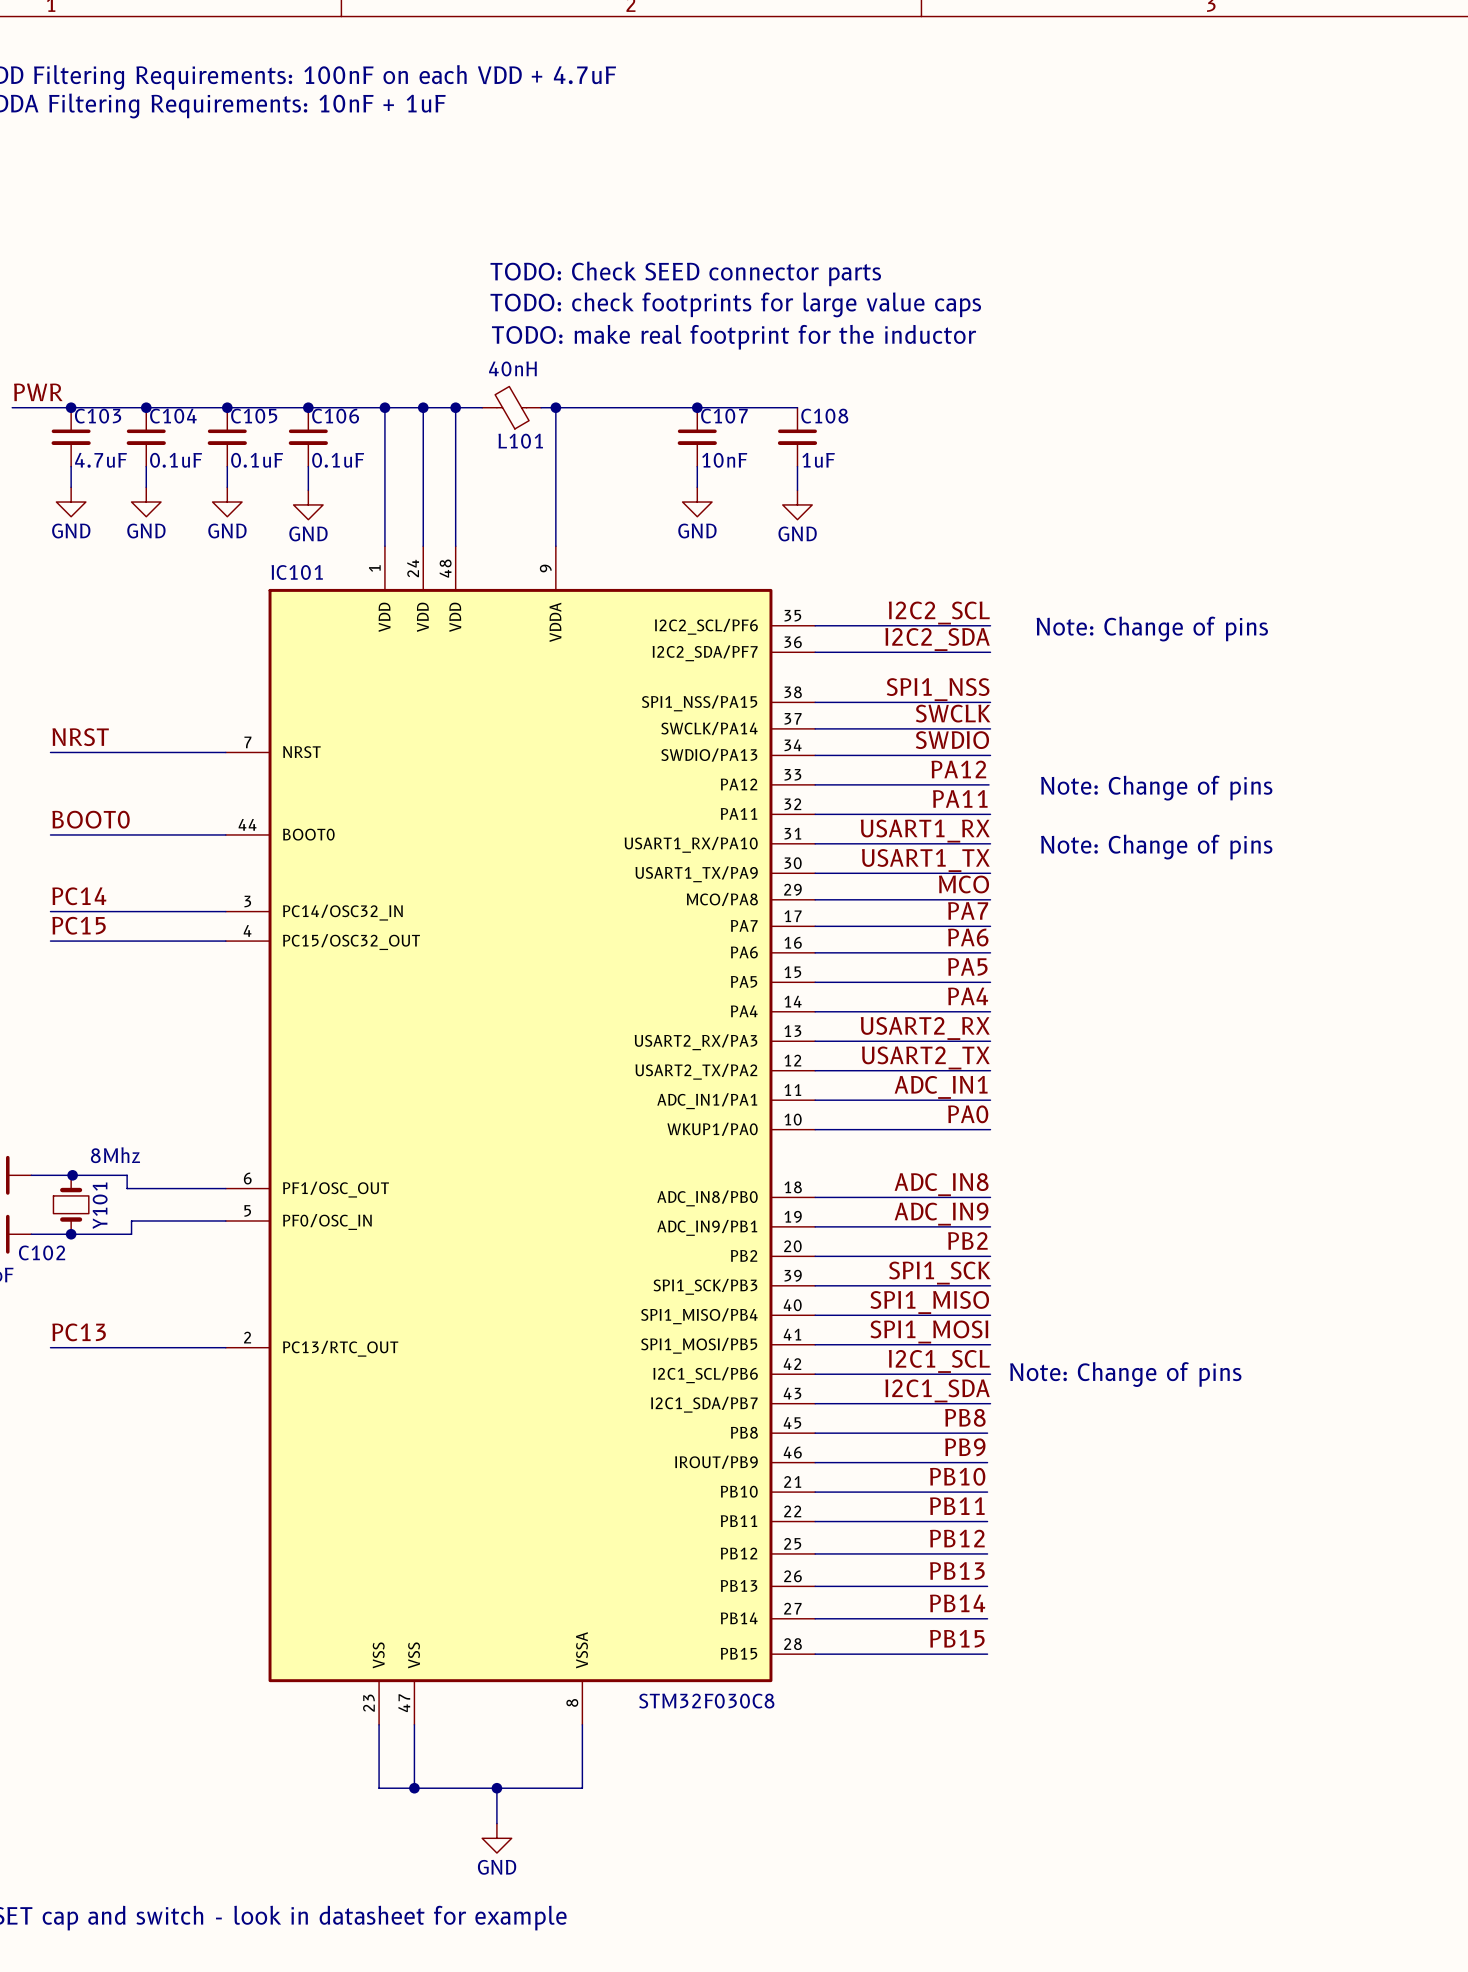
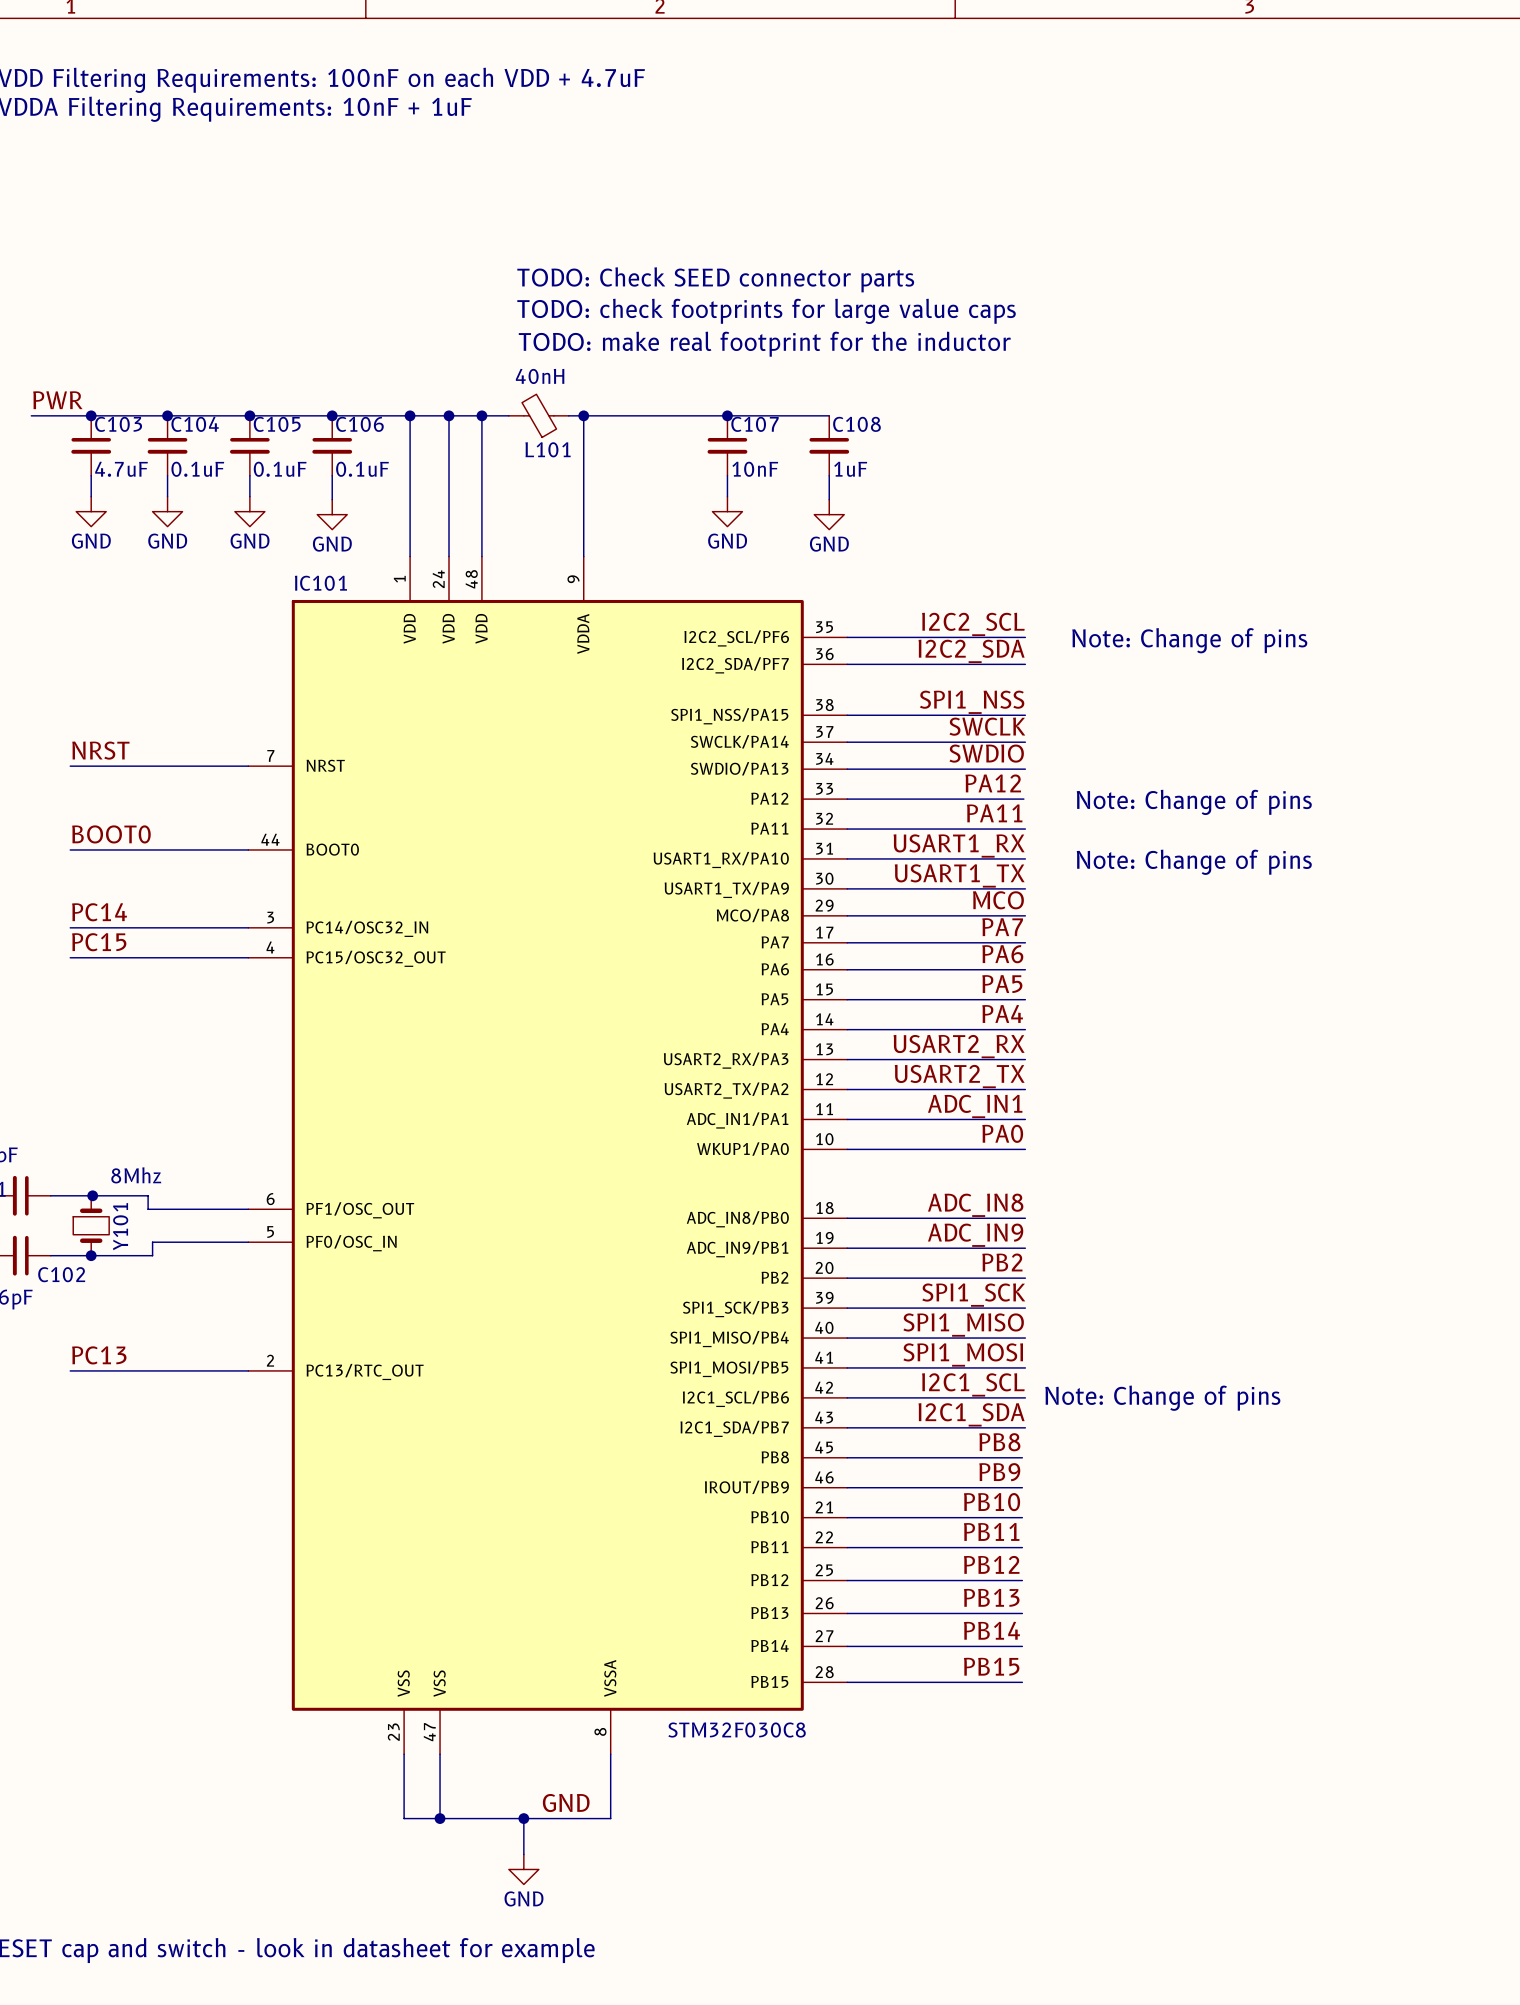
label: none -> GND (566, 1803)

